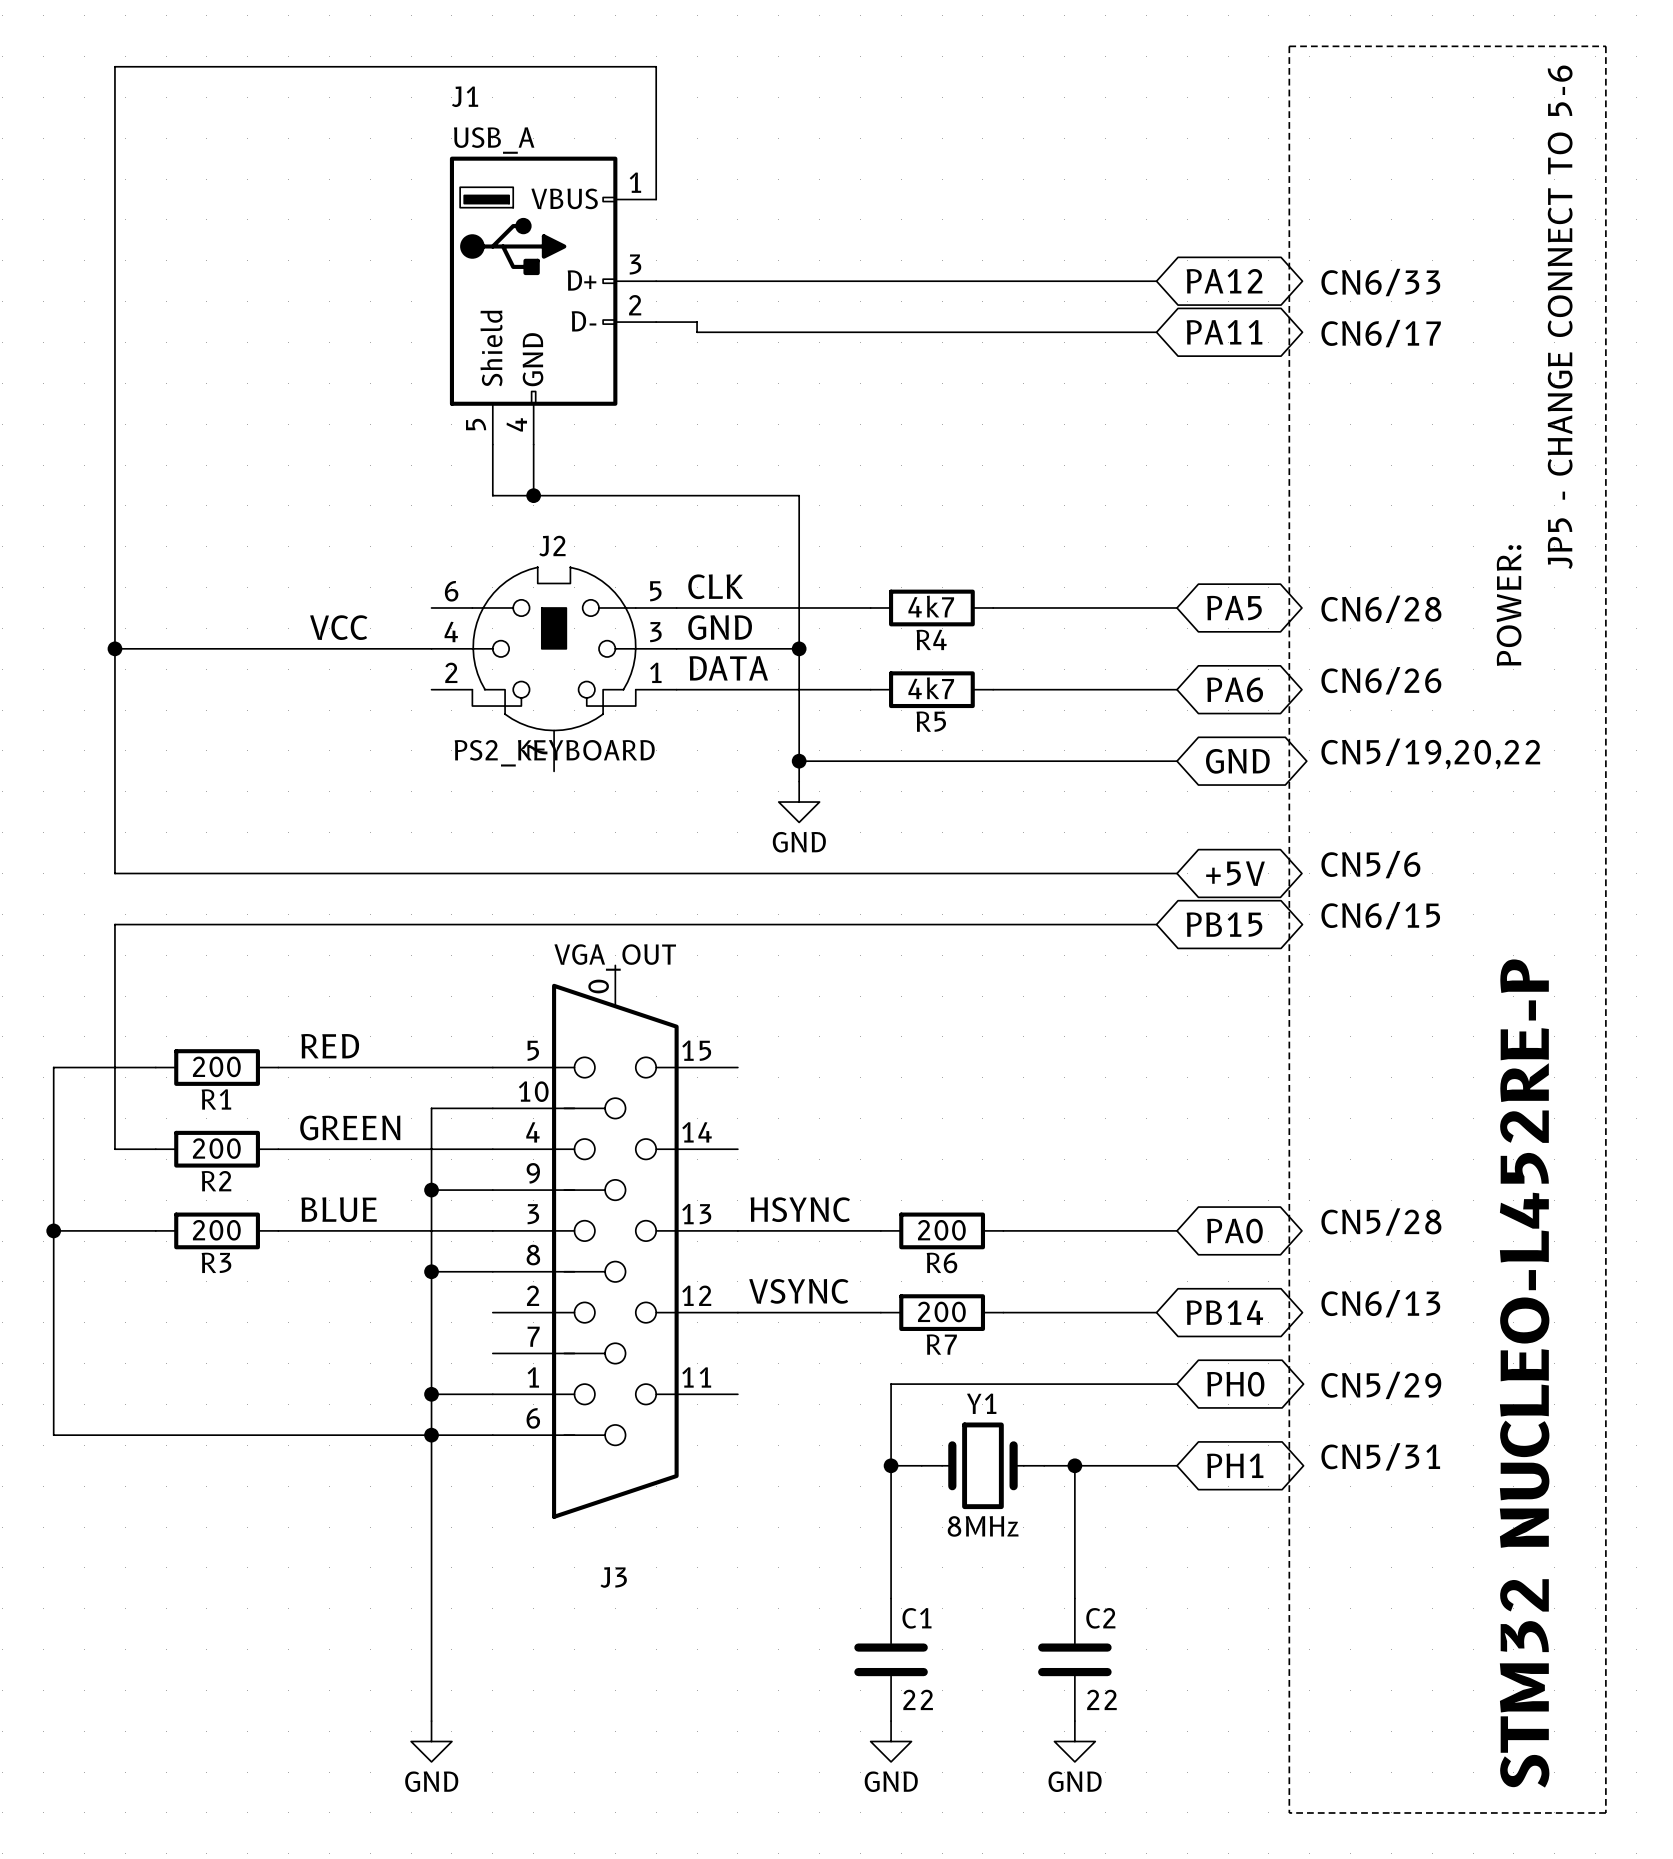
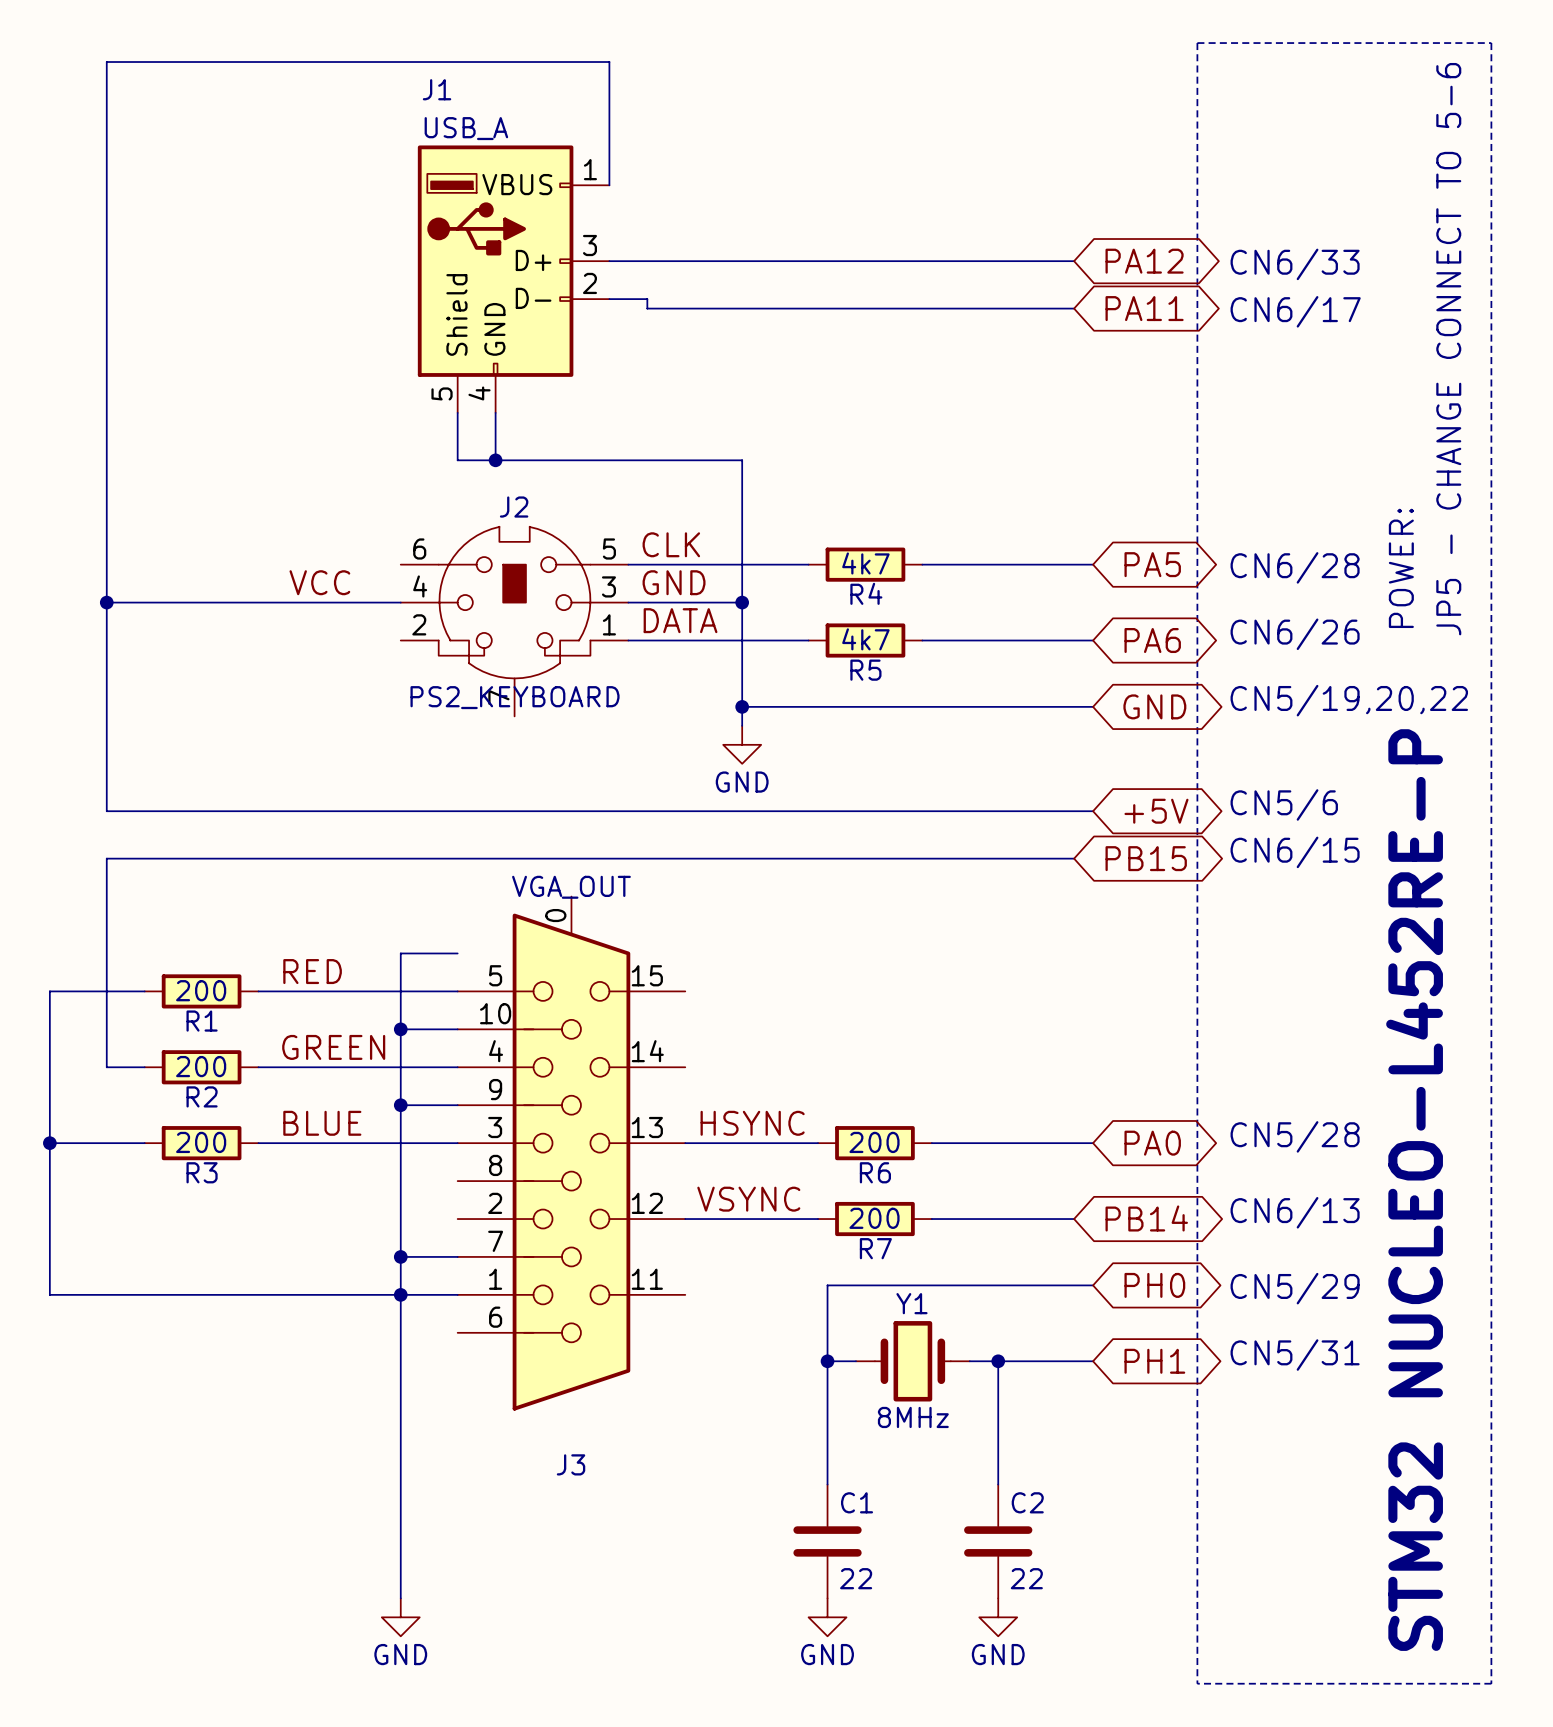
wire: none -> (457, 953) (400, 953) (400, 1029)
junction: none -> (400, 1029)
wire: (431, 1271) (492, 1271) -> (400, 1256) (457, 1256)
junction: (431, 1271) -> none
junction: none -> (400, 1256)
wire: (53, 1394) (53, 1435) (492, 1435) -> (49, 1294) (400, 1294)
junction: (431, 1435) -> none

